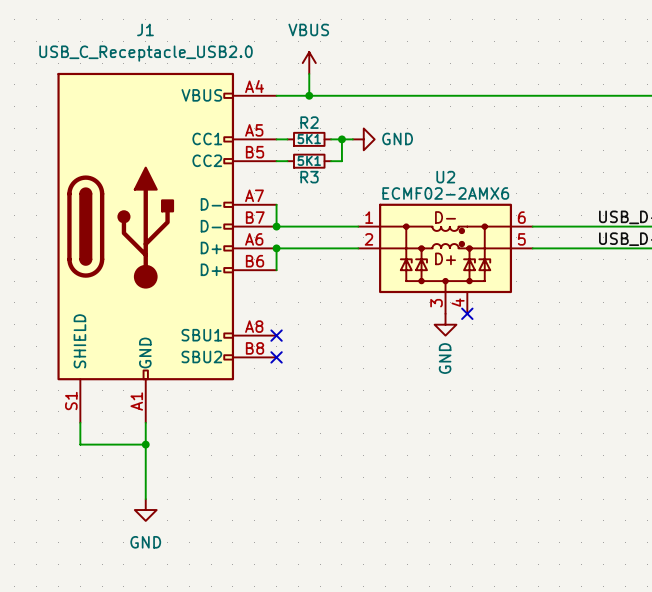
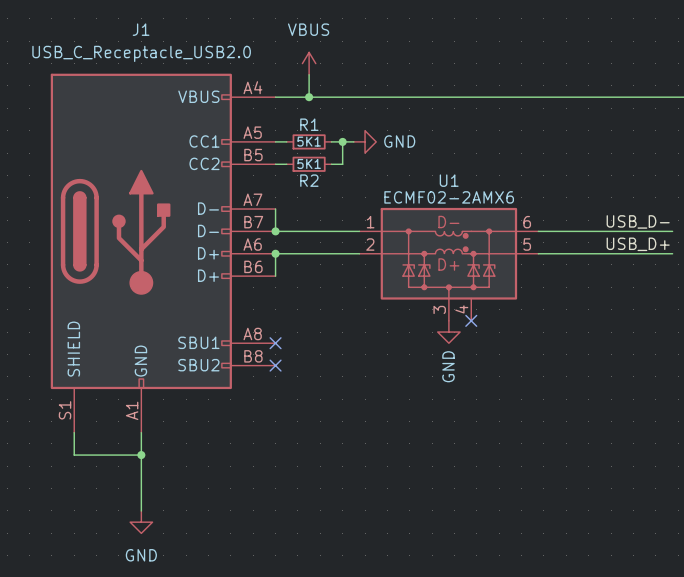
R2 name: R2 (309, 122) -> R1 (309, 124)
R3 name: R3 (309, 177) -> R2 (309, 180)
U2 name: U2 (445, 177) -> U1 (449, 180)

